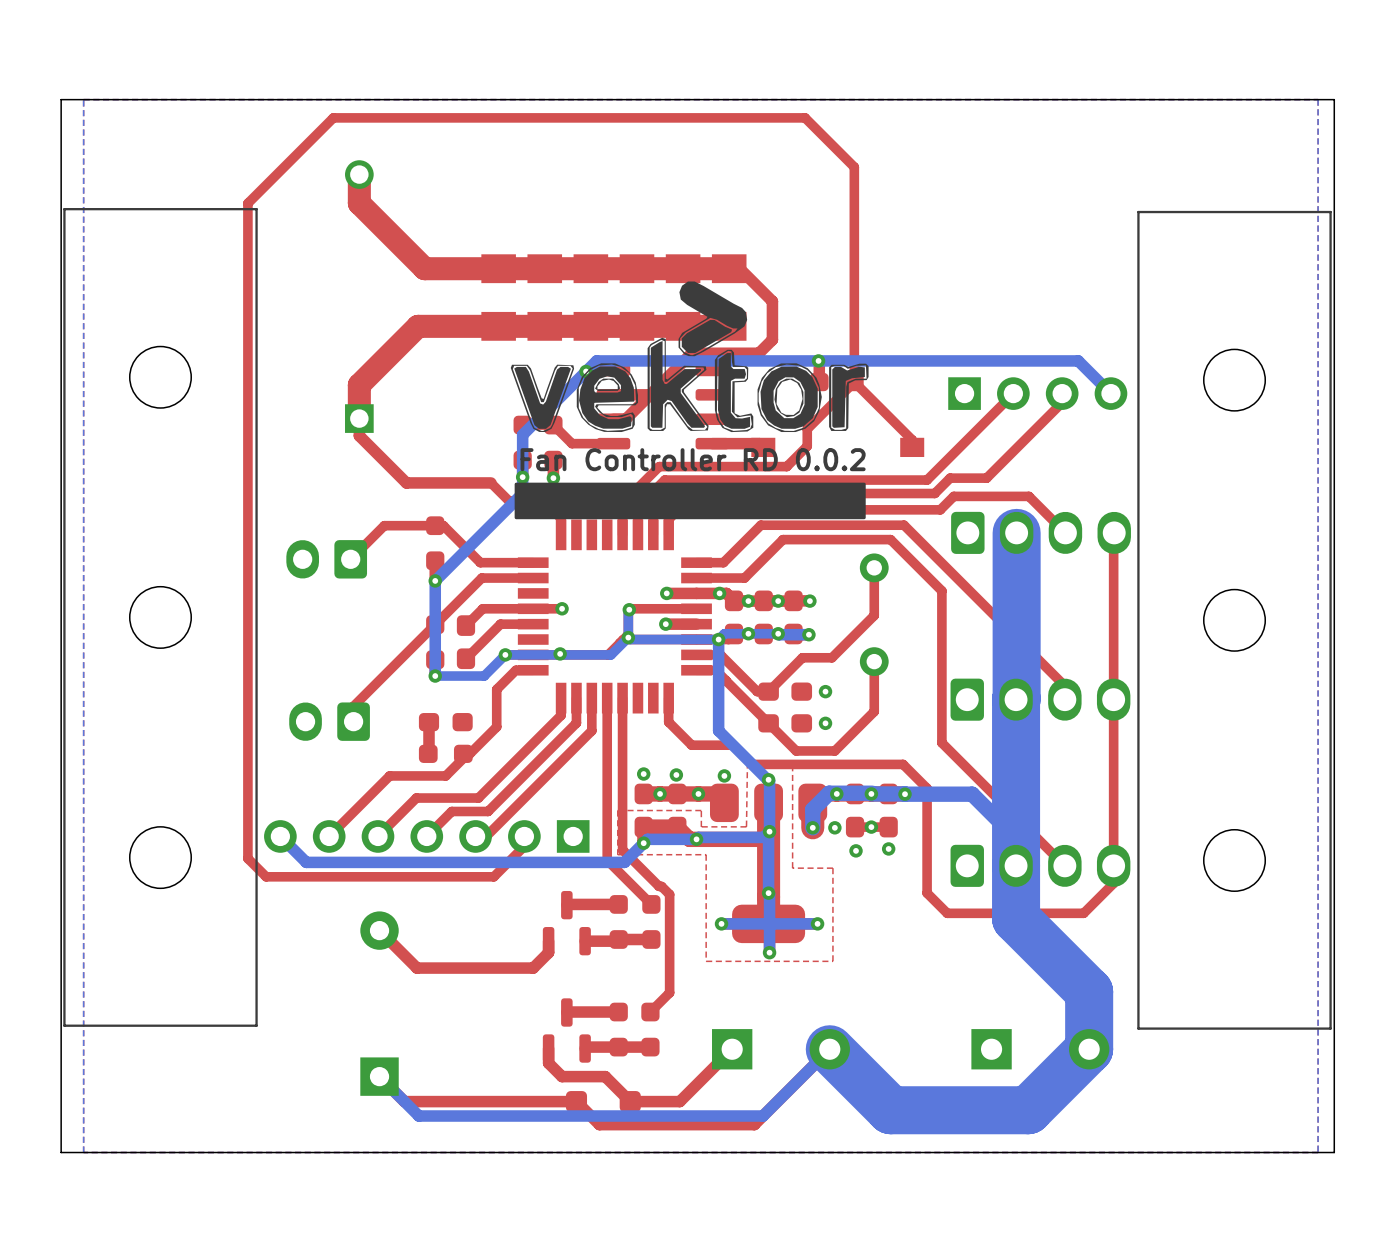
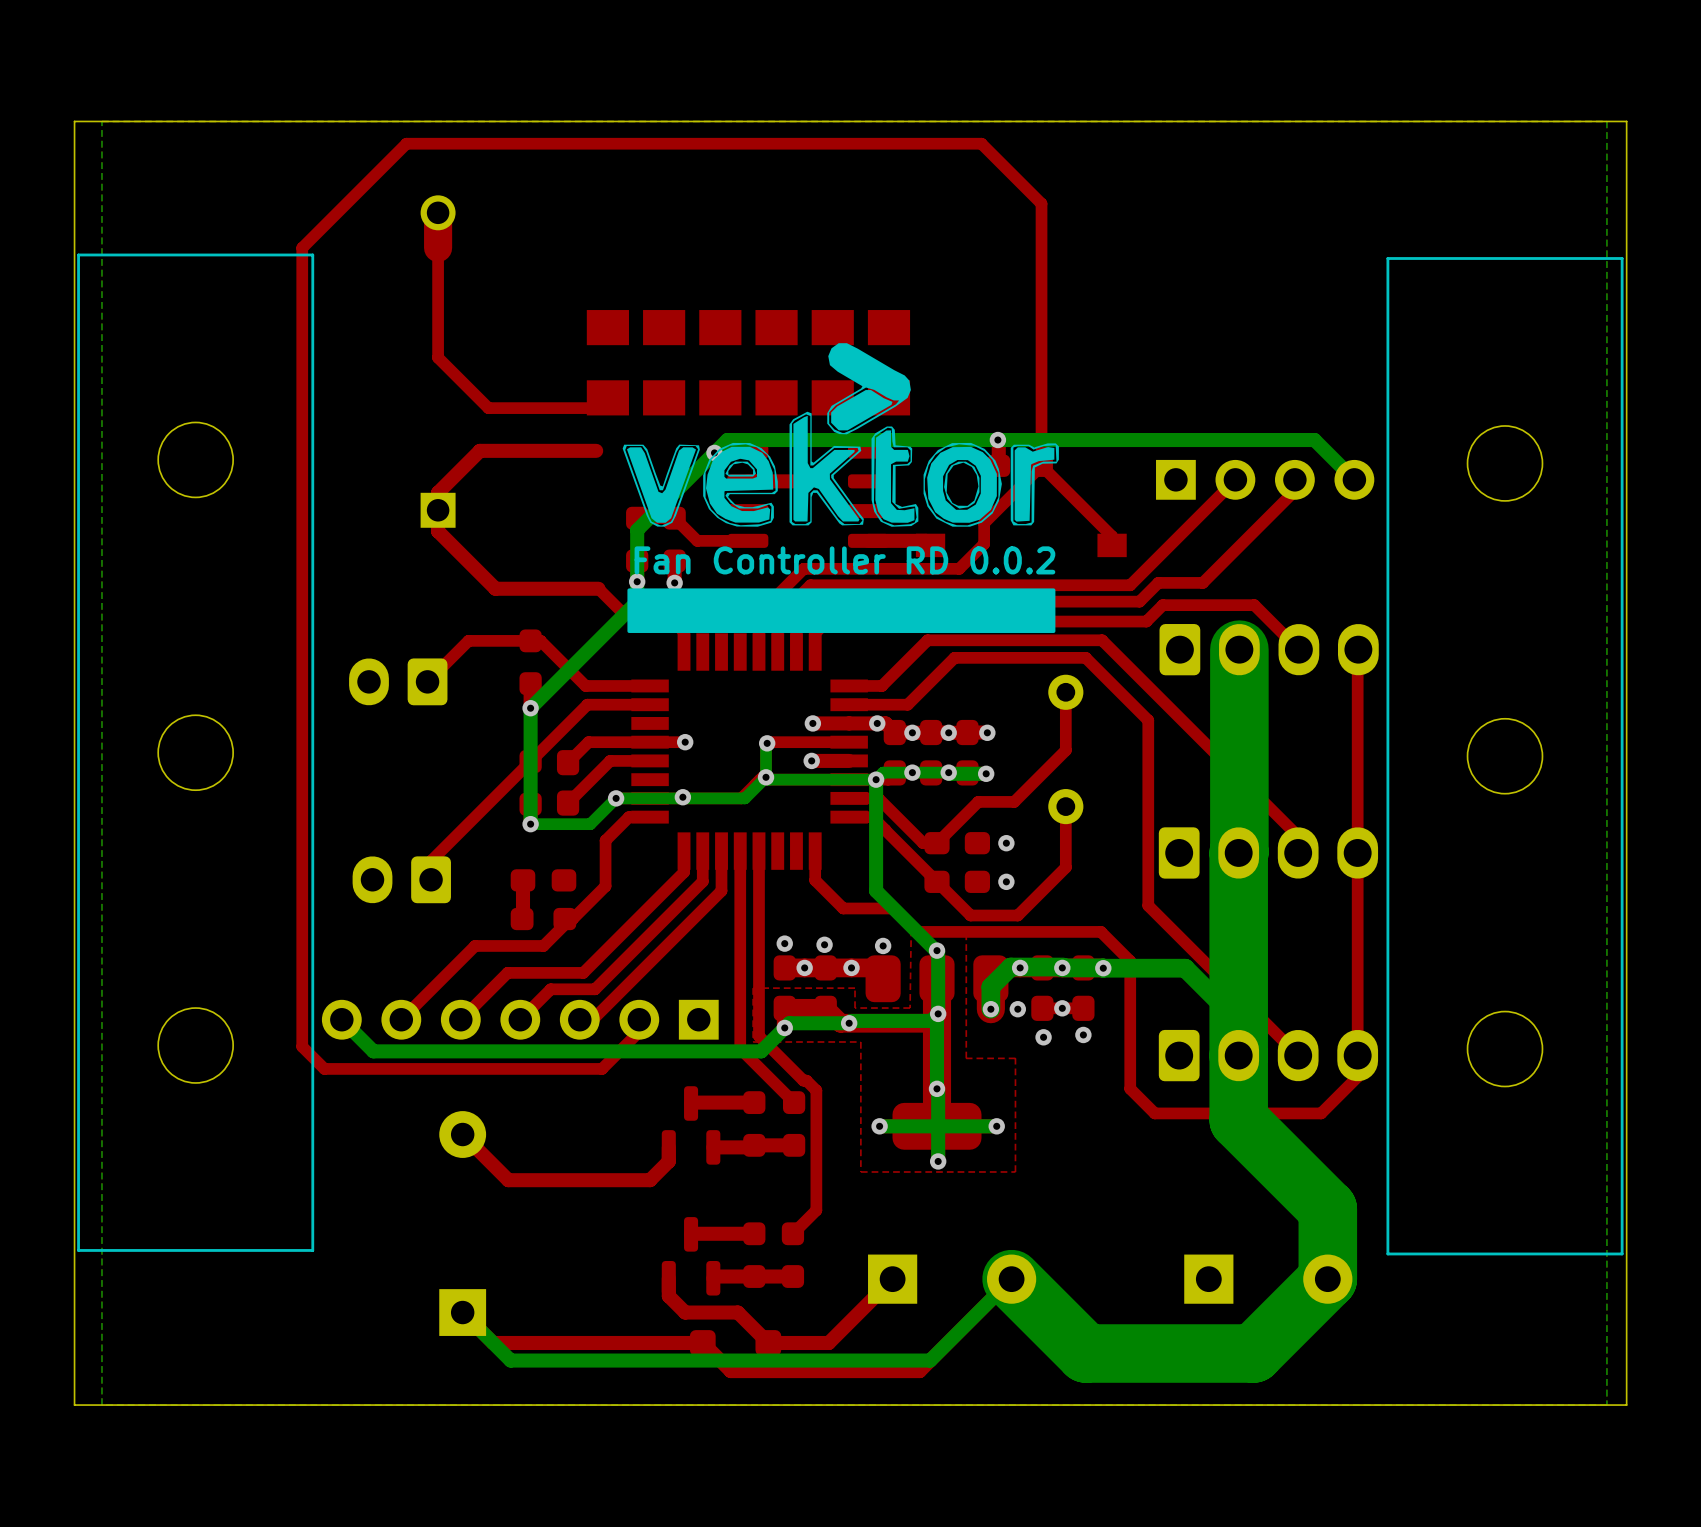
top track: (359, 203) (424, 268) (739, 268) (772, 301) (772, 339) (758, 353) (691, 353) (625, 419) (613, 419) -> (438, 247) (438, 357) (488, 408) (596, 408)
top track: (729, 326) (417, 326) (359, 384) (359, 404) -> (596, 450) (479, 450) (438, 492)

